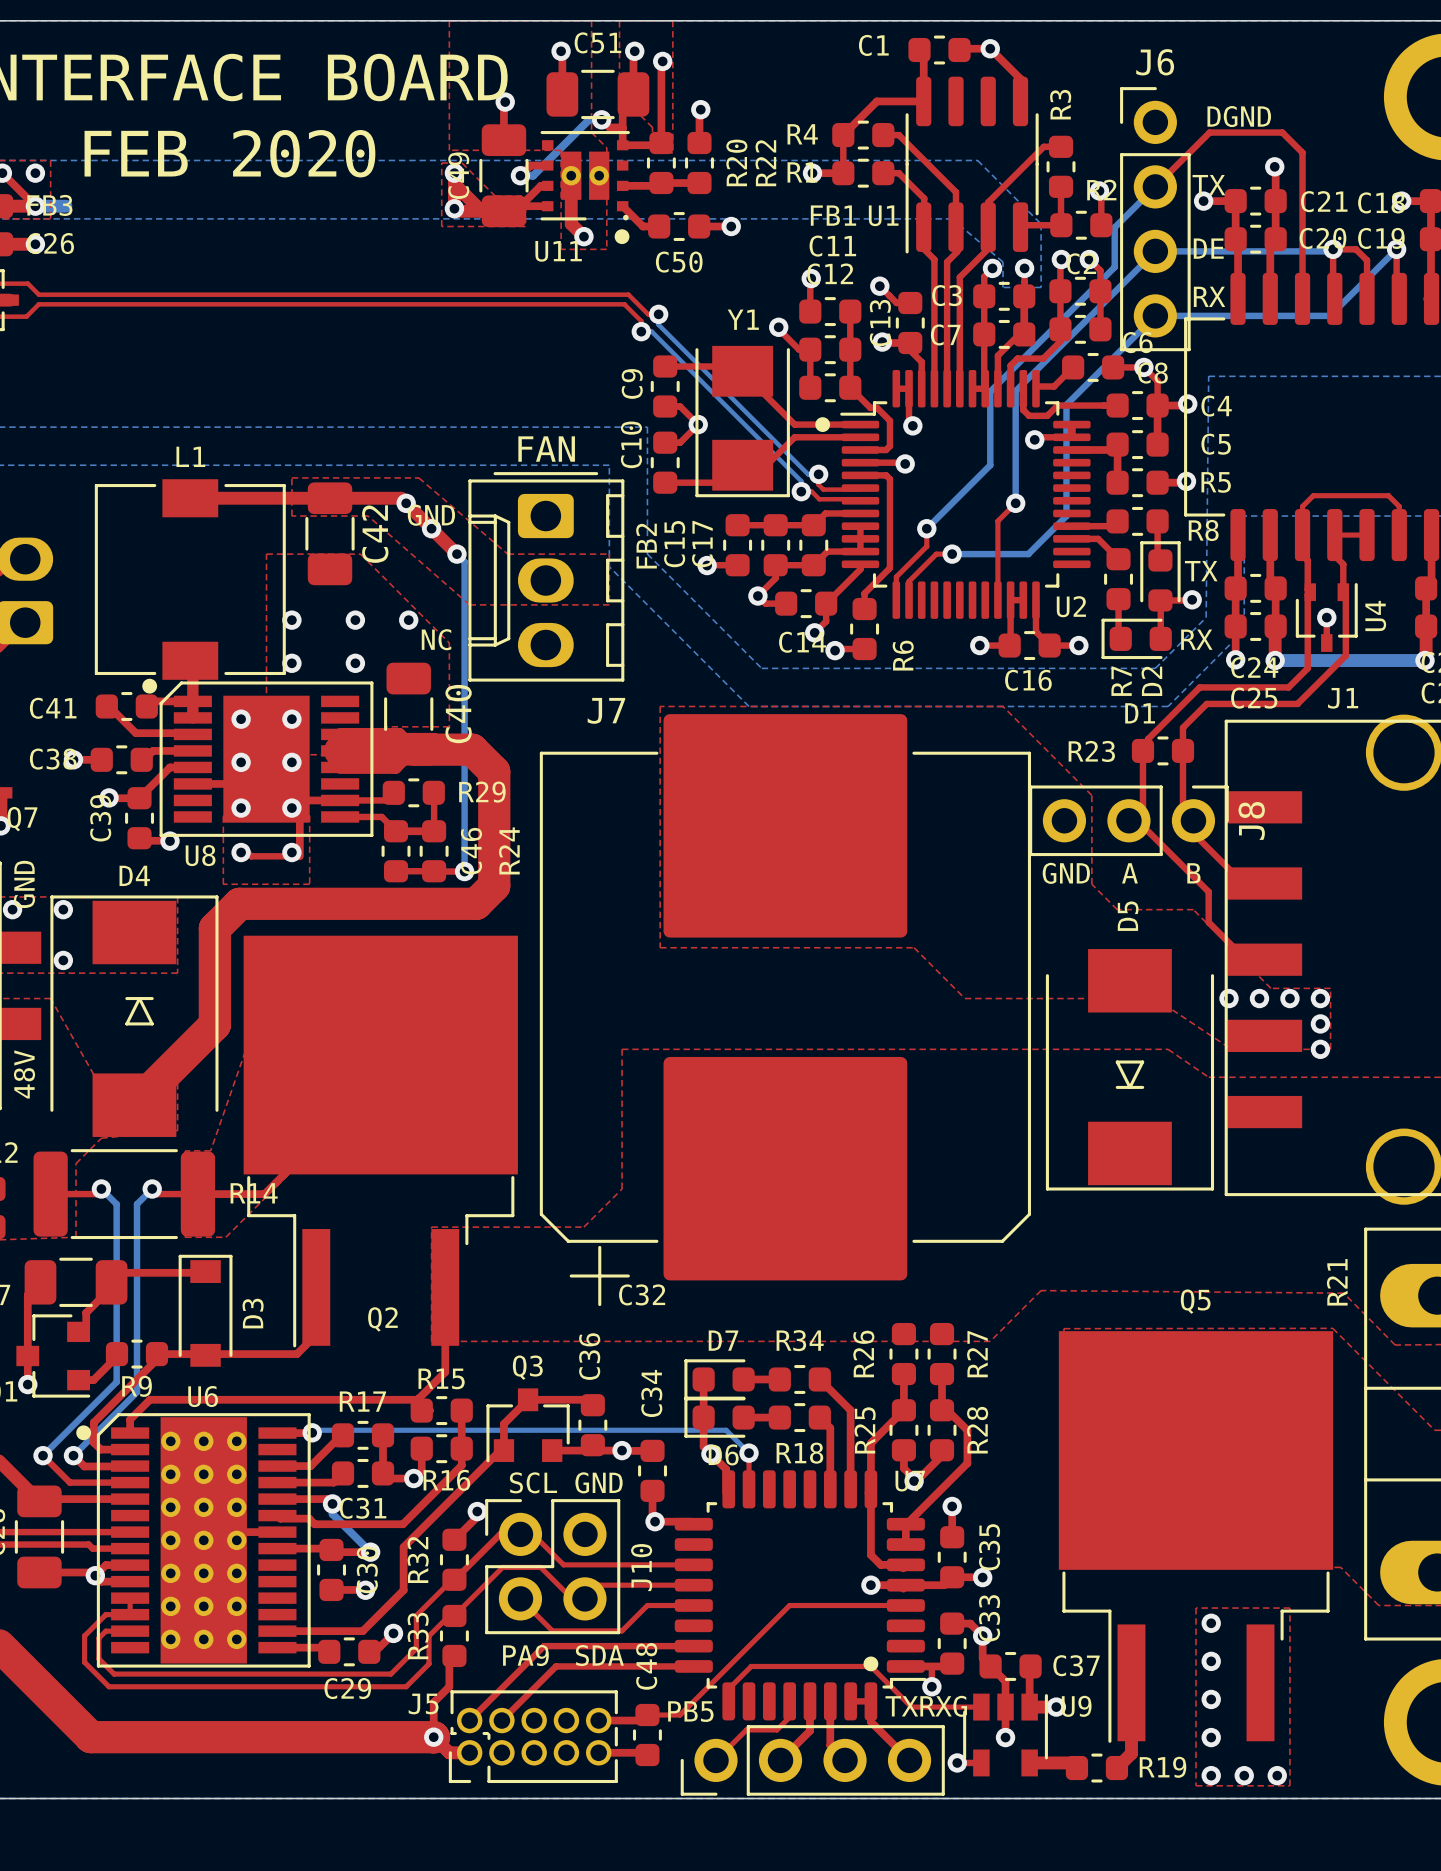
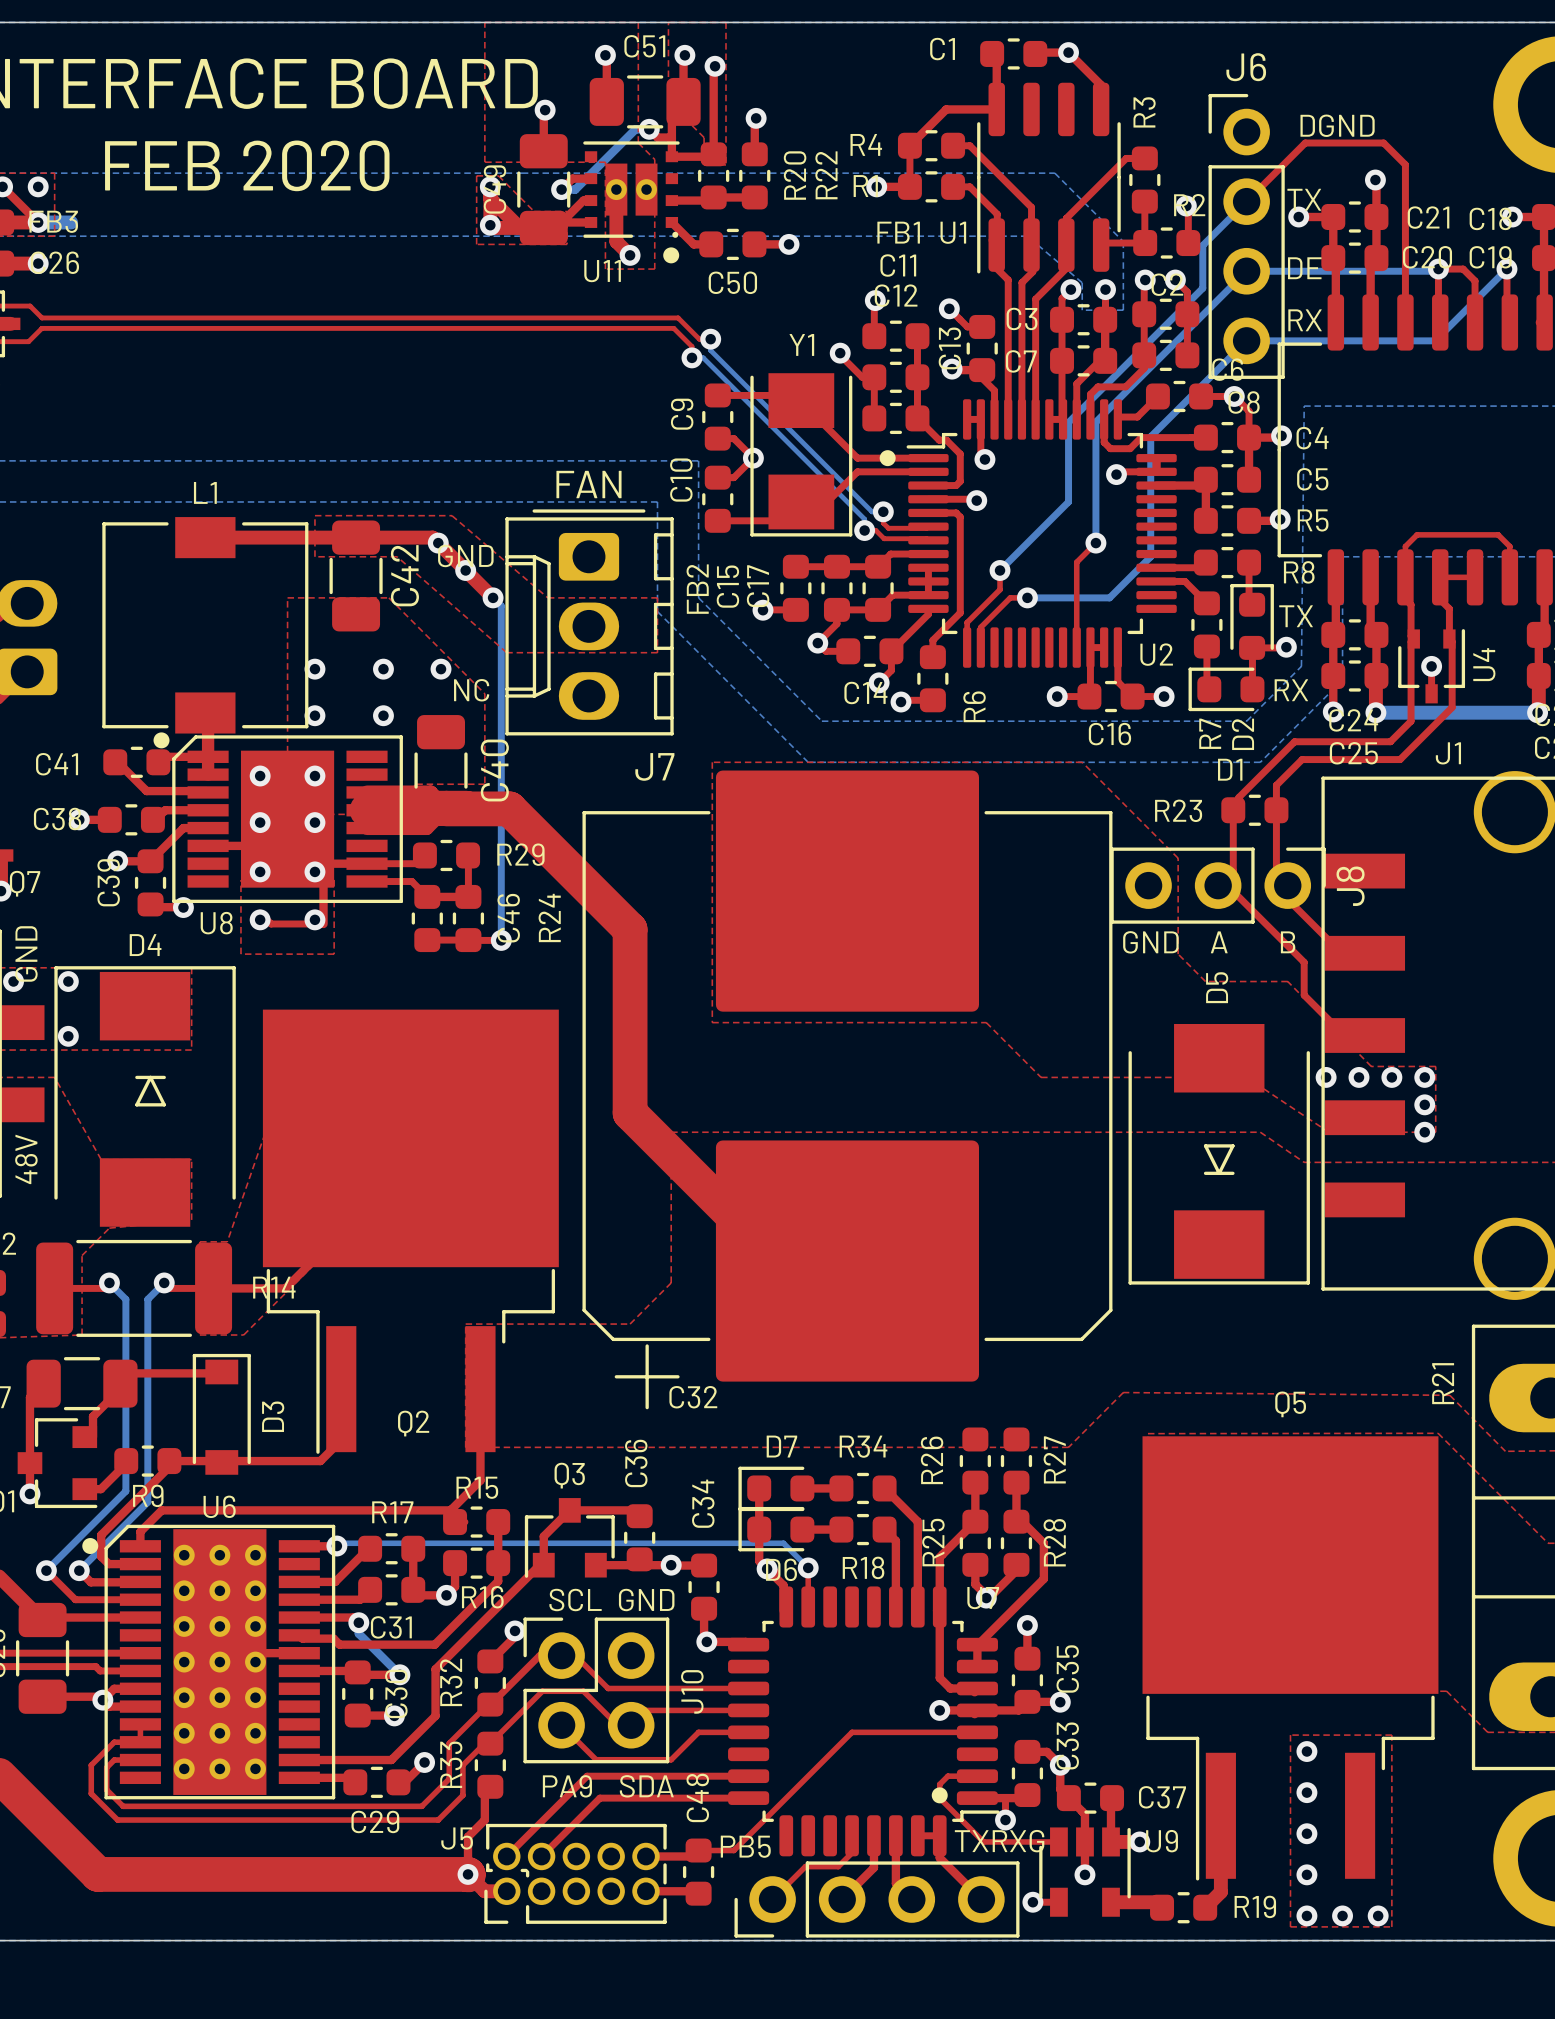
top track: (494, 771) (494, 885) (476, 903) (239, 903) (214, 928) (214, 1024) (134, 1105) -> (533, 832) (630, 929) (630, 1113) (778, 1261) (847, 1261)
top track: (870, 1666) (751, 1666) (728, 1688) (728, 1701) -> (939, 1798) (939, 1784) (947, 1776) (977, 1776)

